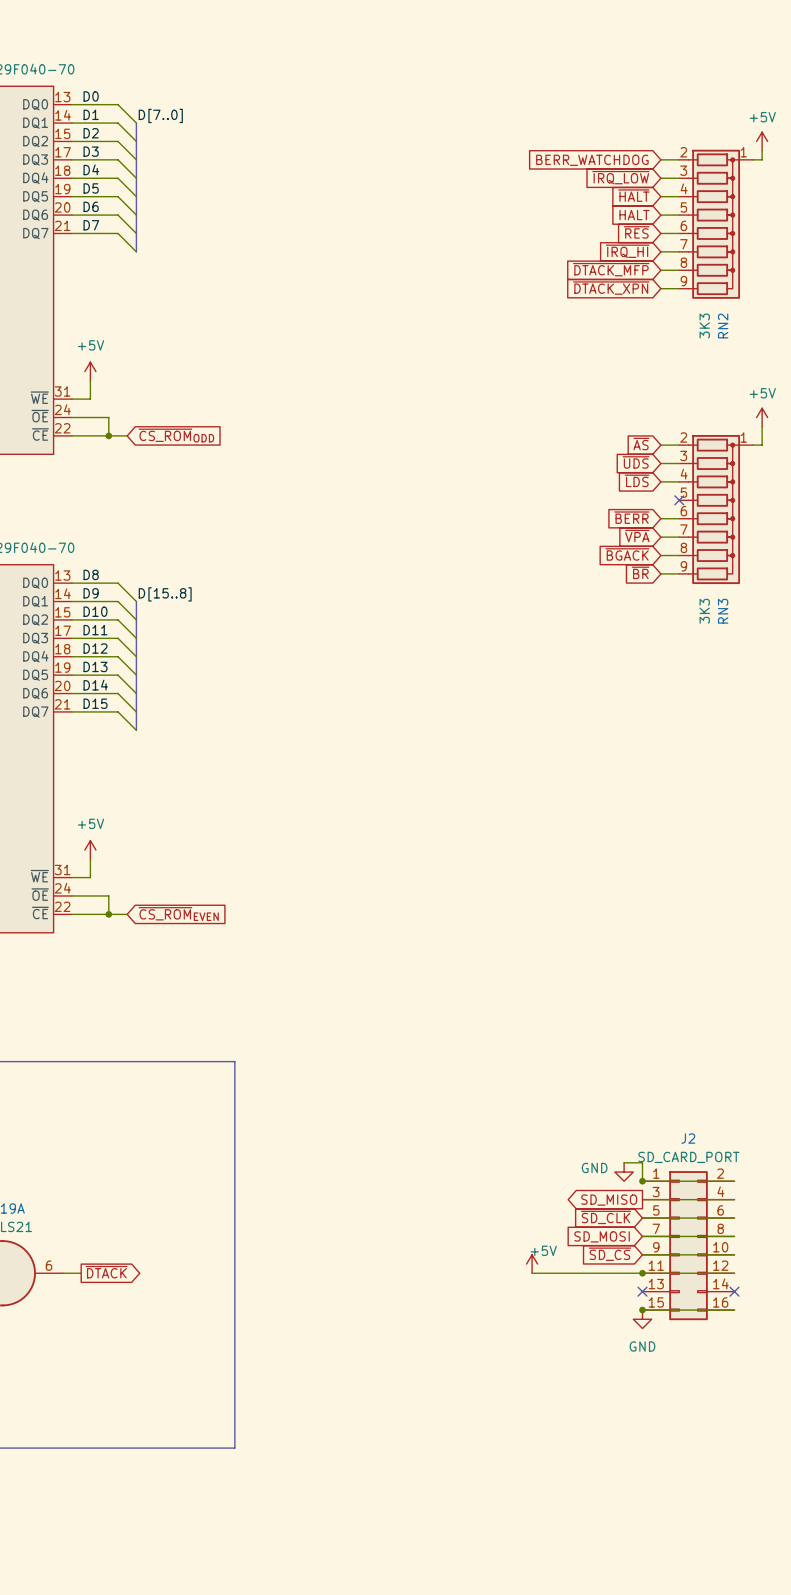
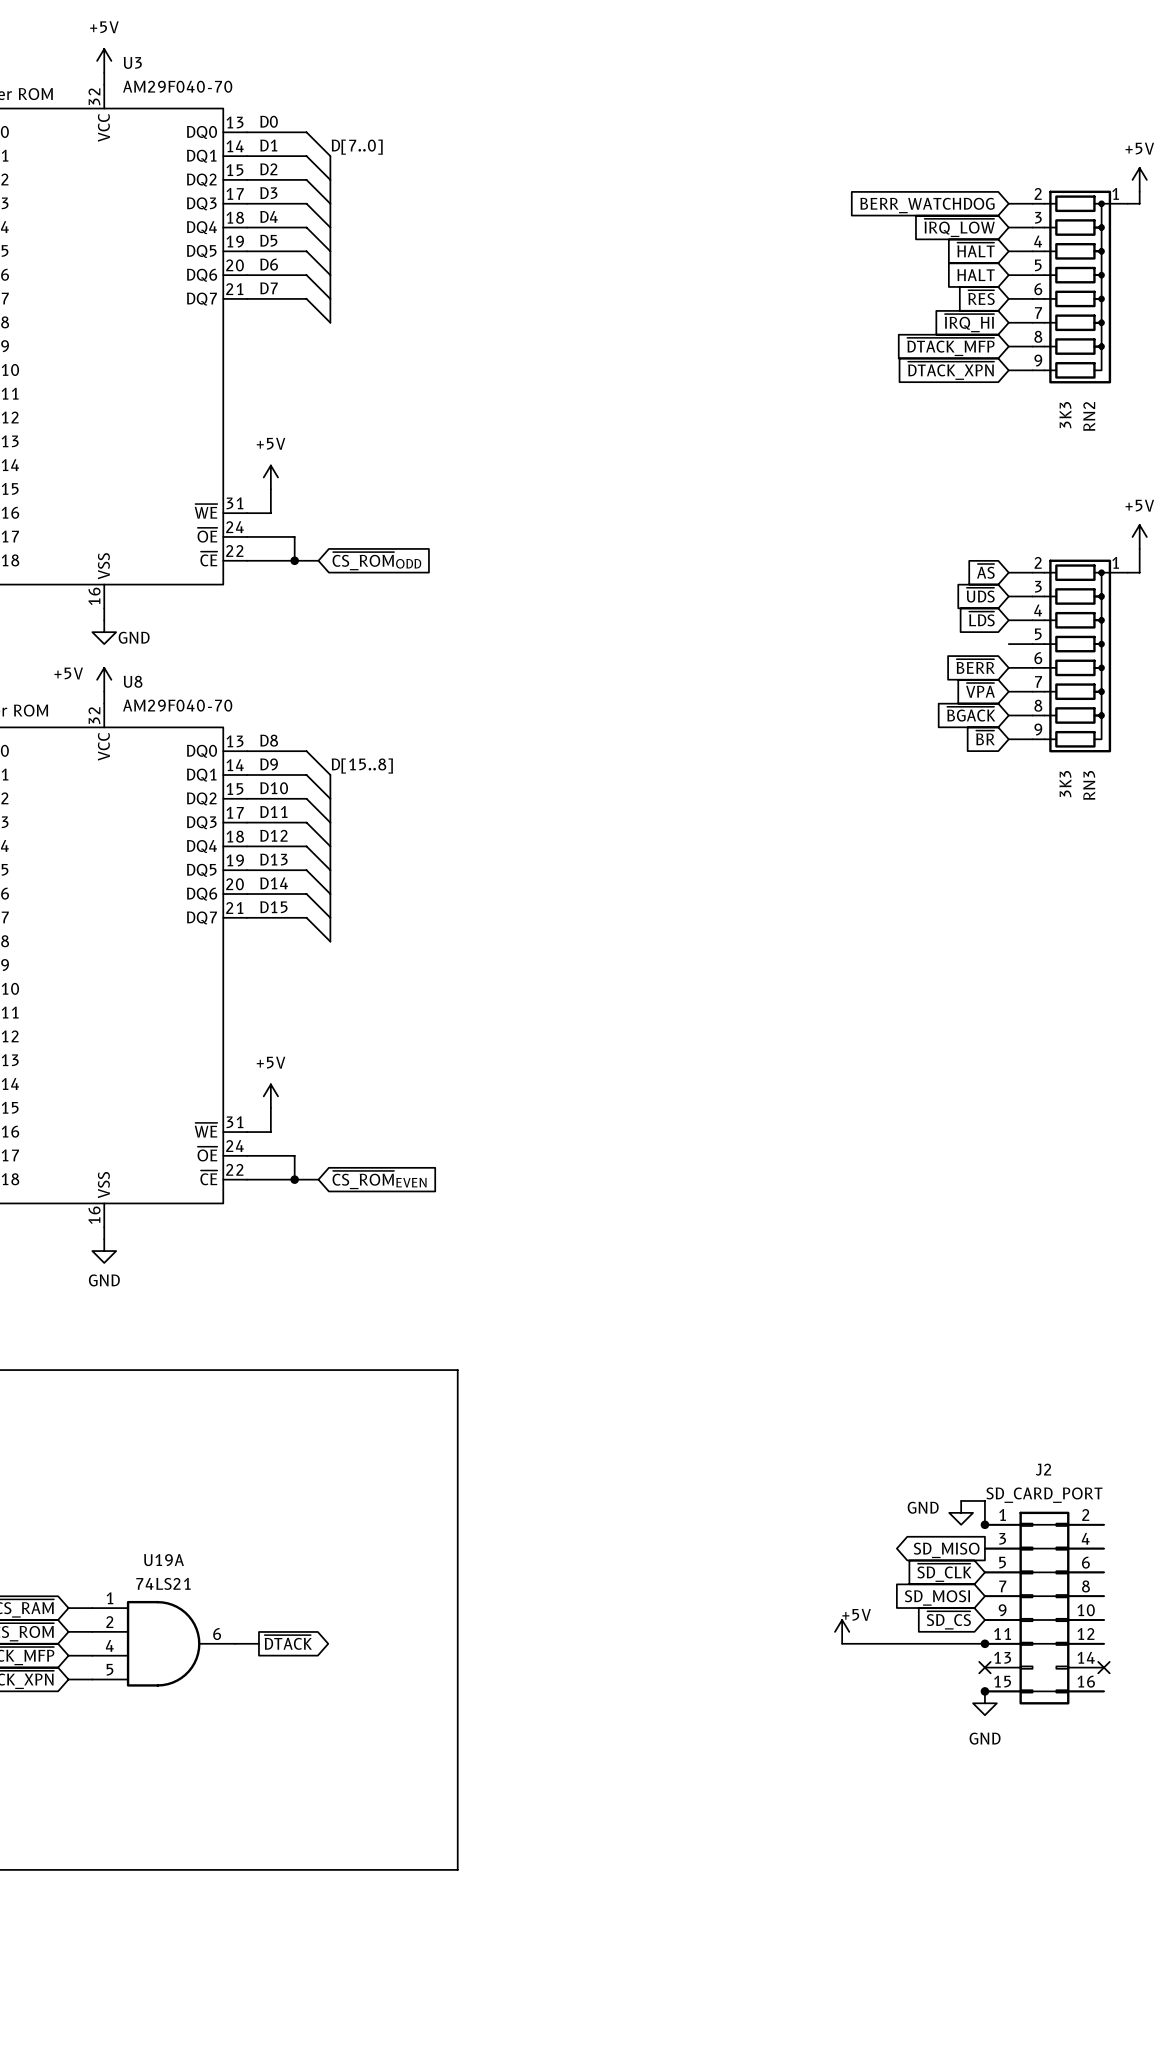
wire: none -> (1008, 644) (1032, 644)
no-connect mark: (679, 500) -> none

